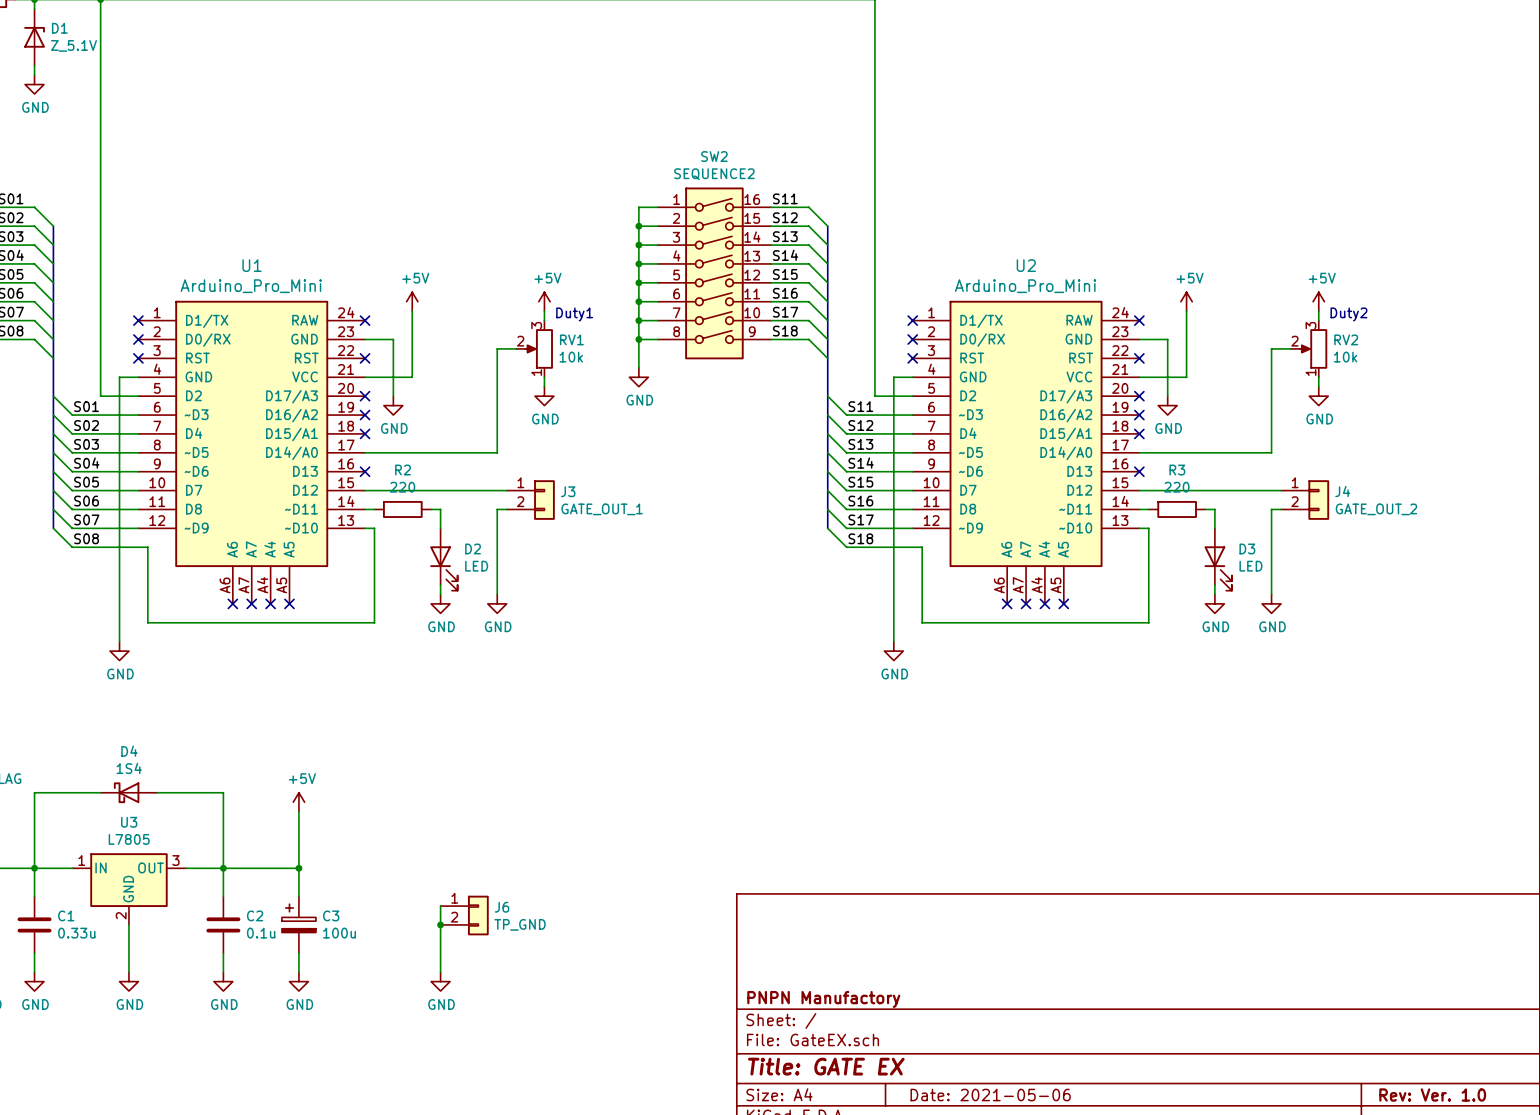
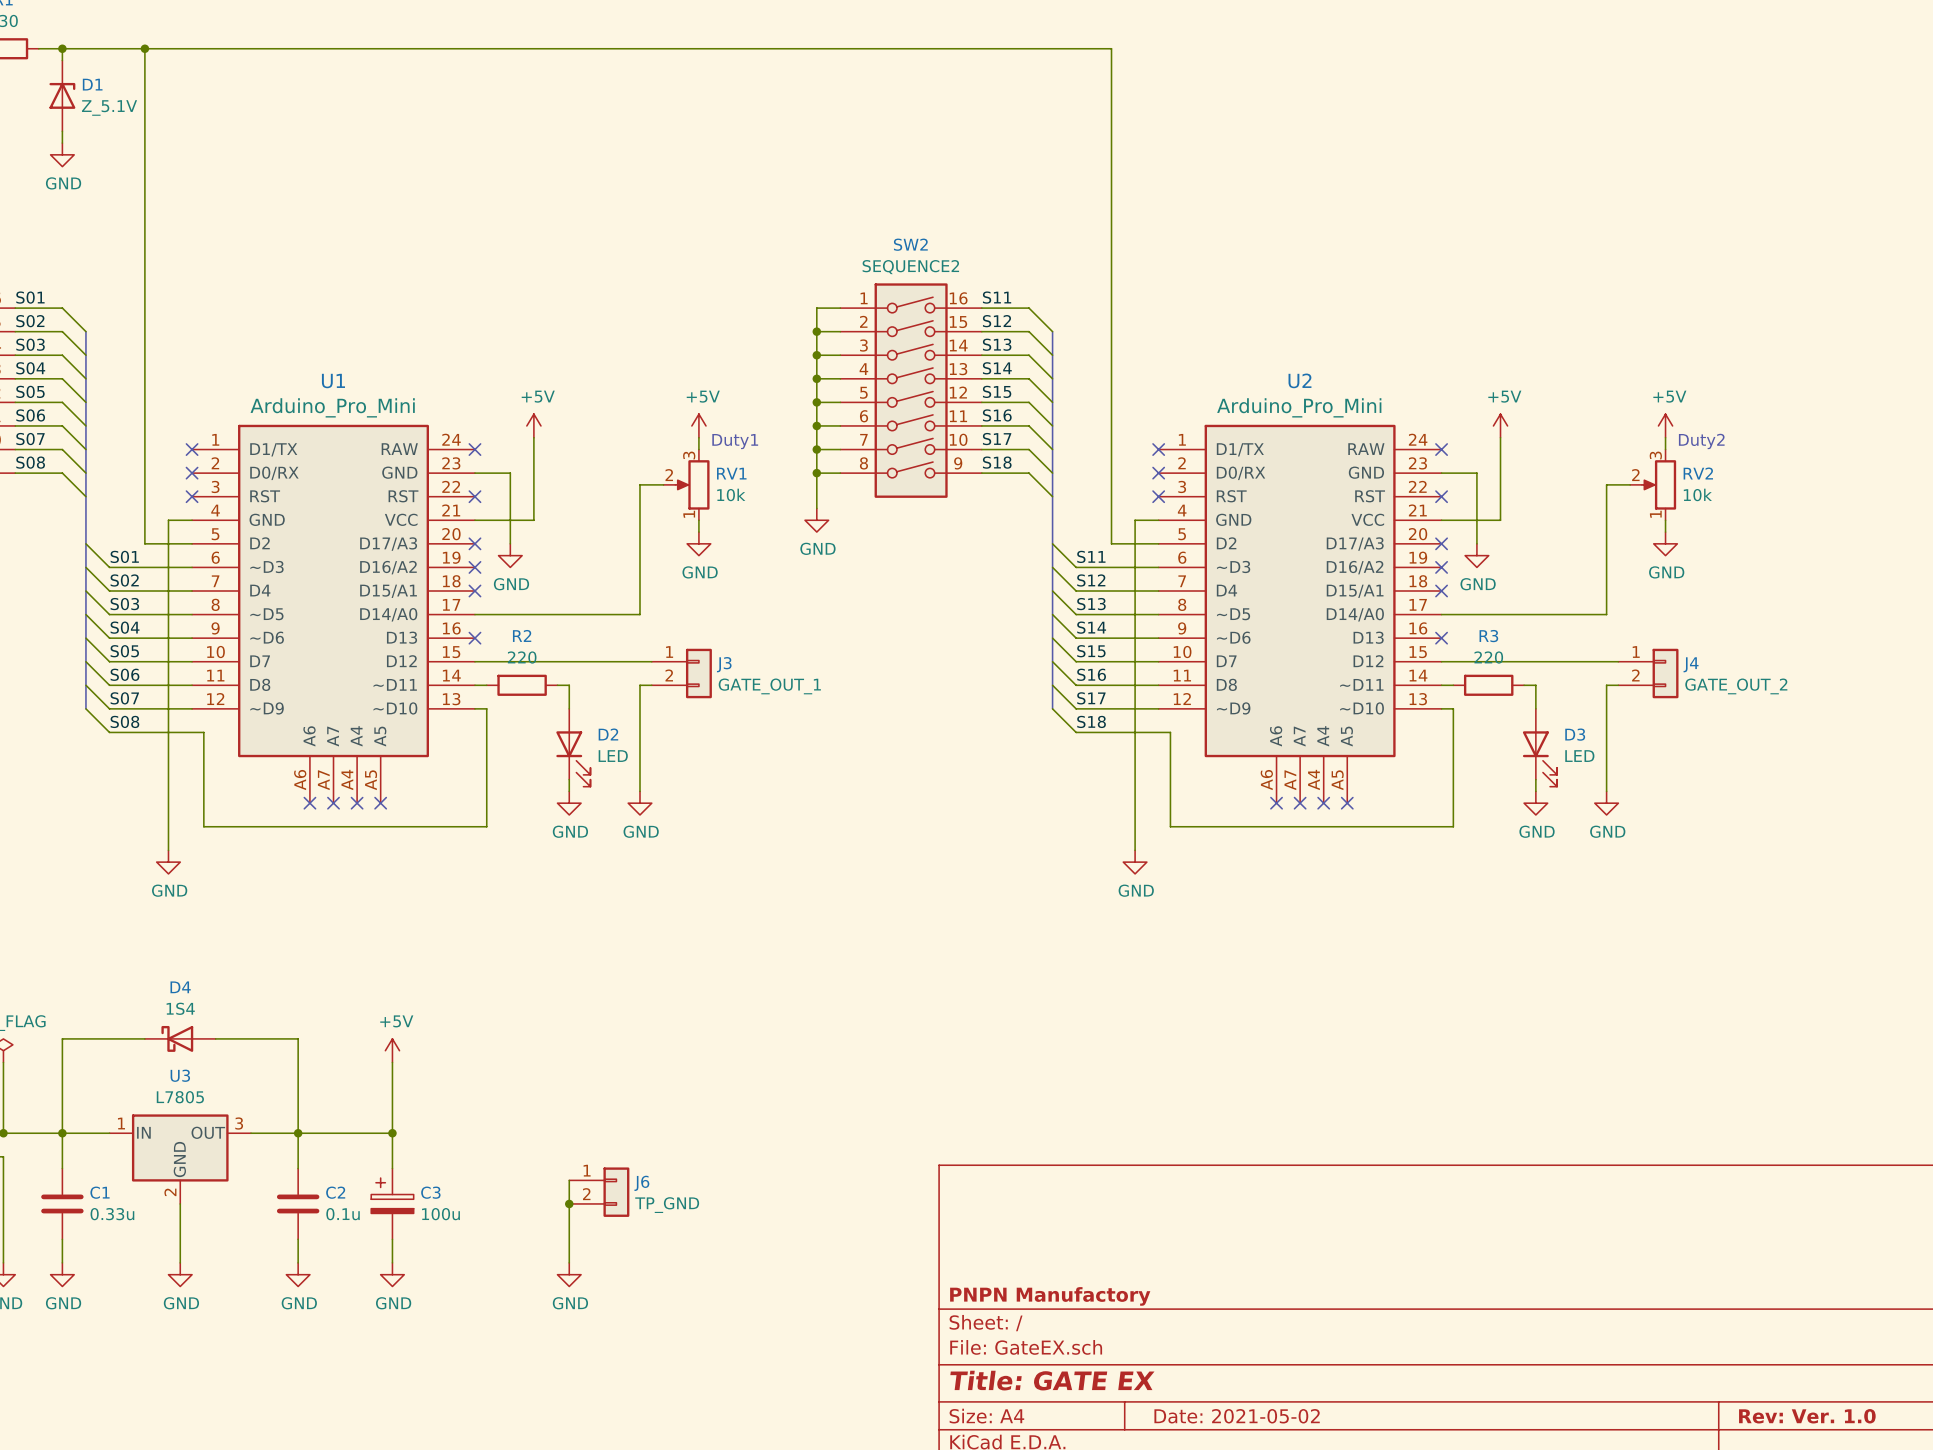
title block: Date: 2021-05-06 (990, 1095) -> Date: 2021-05-02 (1237, 1416)

